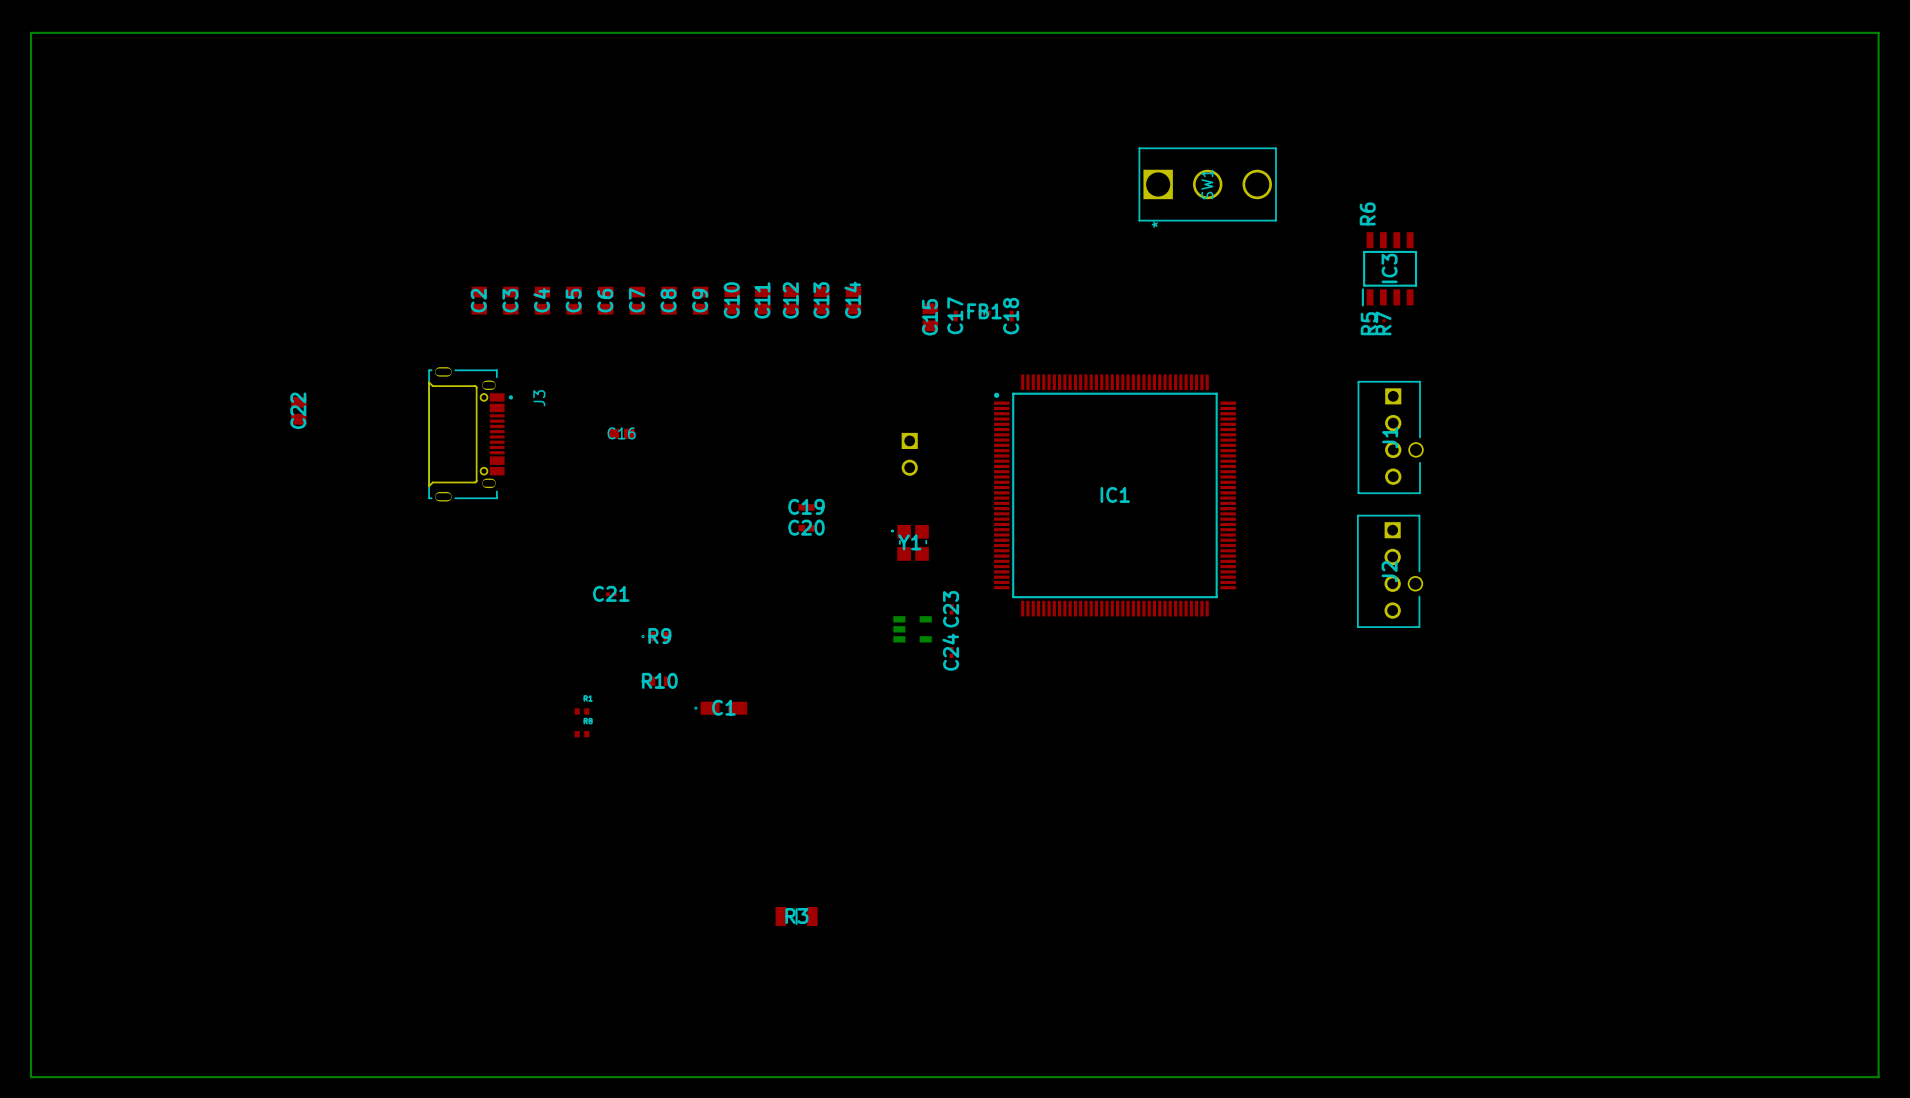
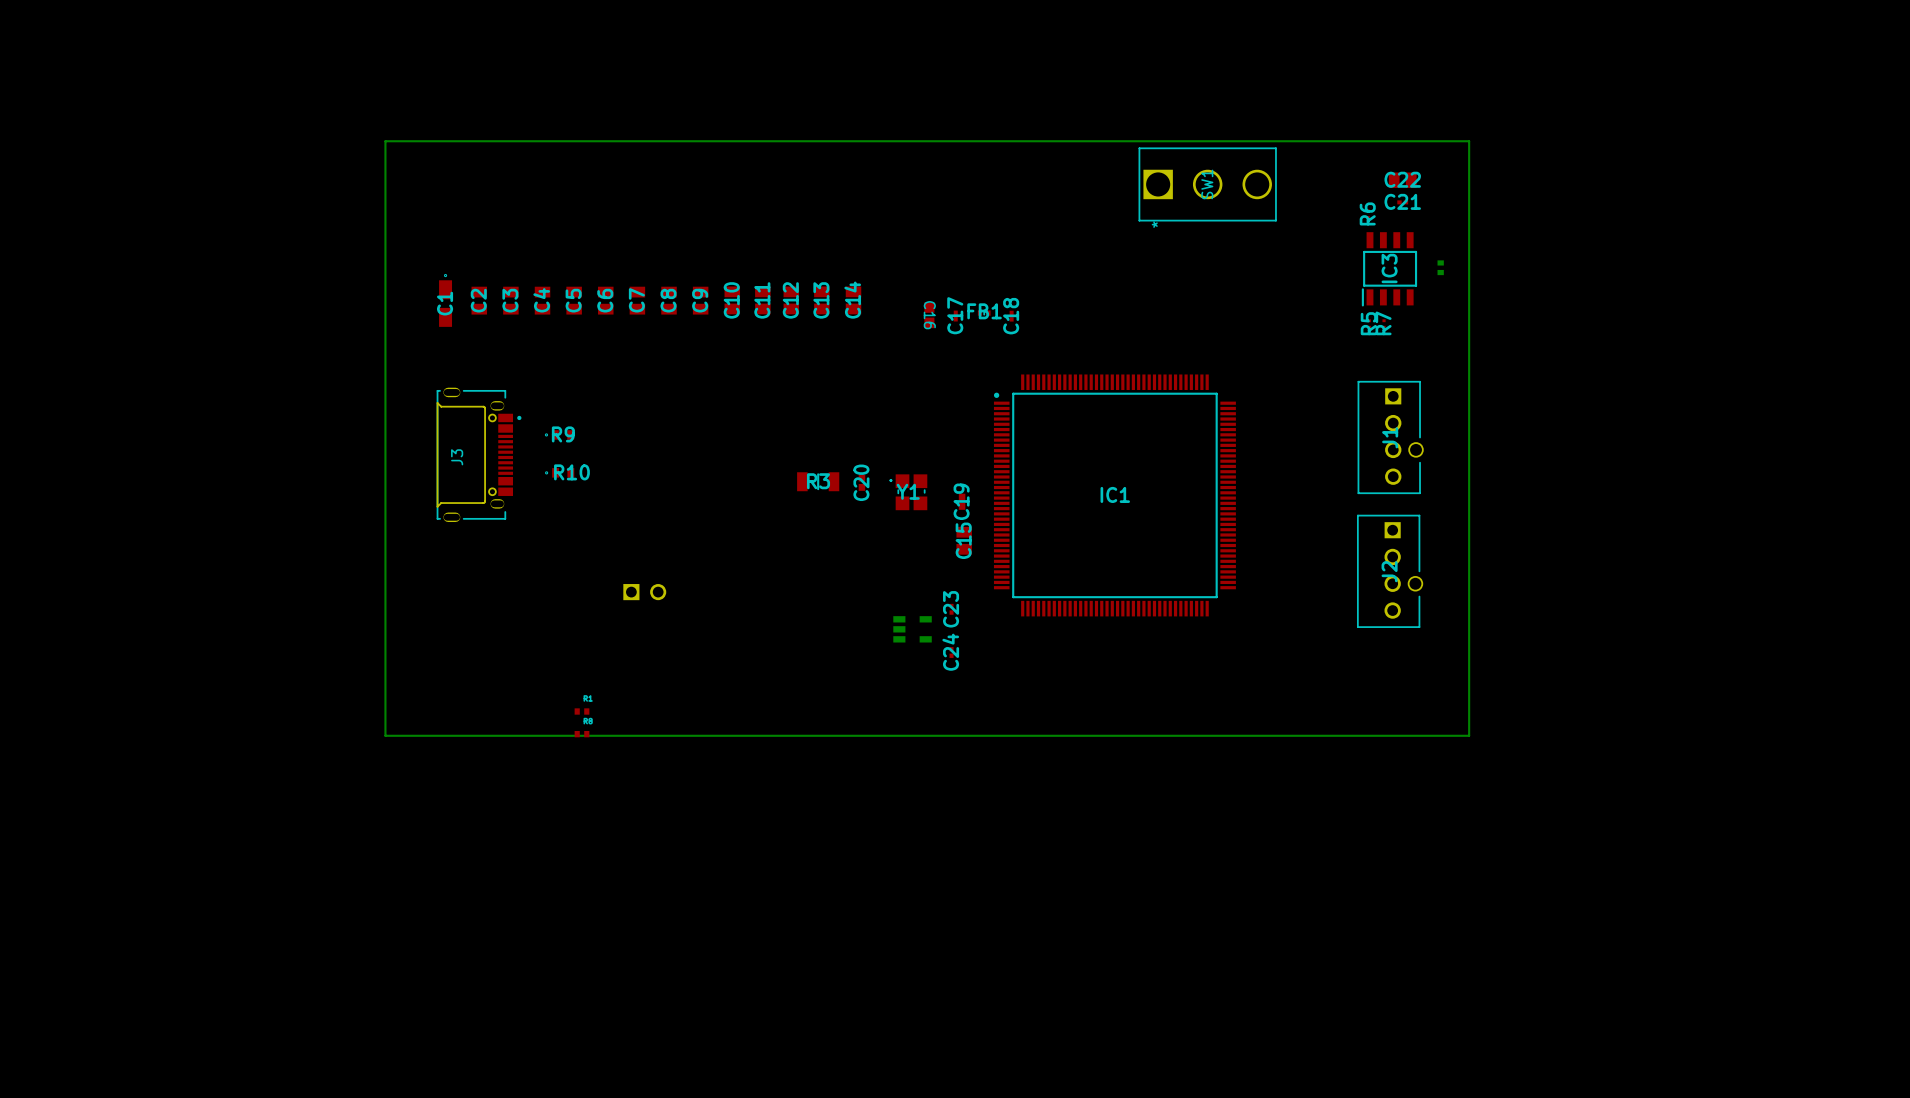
bottom track: (31, 32) (1878, 32) (1878, 1077) (31, 1077) (31, 32) -> none
bottom track: none -> (385, 141) (1469, 141) (1469, 735) (385, 735) (385, 141)
part: none -> (1440, 267)
C15 position: (930, 317) -> (964, 540)
J3 name position: J3 (539, 398) -> J3 (457, 457)
C22 rotation: 0° (298, 410) -> 90° clockwise (1402, 180)
C22 position: (298, 410) -> (1402, 180)
C16 rotation: 0° (621, 433) -> 90° clockwise (929, 315)
C16 position: (621, 433) -> (929, 315)
J3 position: (470, 434) -> (479, 454)
part: (909, 454) -> none
C19 rotation: 0° (806, 507) -> 90° clockwise (962, 501)
C19 position: (806, 507) -> (962, 501)
C20 rotation: 0° (806, 528) -> 90° clockwise (861, 482)
C20 position: (806, 528) -> (861, 482)
Y1 position: (910, 542) -> (908, 492)
part: none -> (644, 592)
C21 position: (611, 594) -> (1402, 202)
R9 position: (655, 636) -> (559, 434)
R10 name position: R10 (659, 680) -> R10 (571, 472)
R10 position: (655, 681) -> (559, 472)
C1 rotation: 0° (720, 708) -> 90° clockwise (445, 300)
C1 position: (720, 708) -> (445, 300)
R3 position: (796, 916) -> (818, 481)

